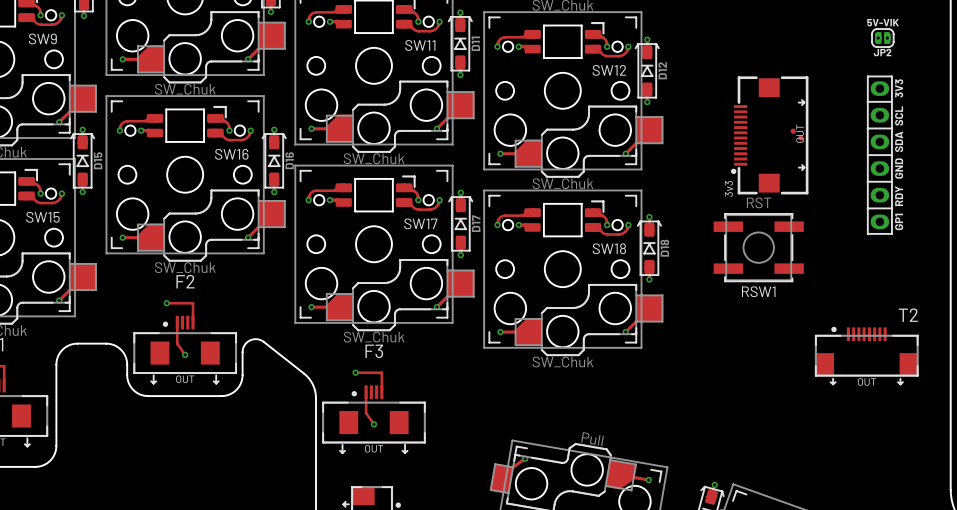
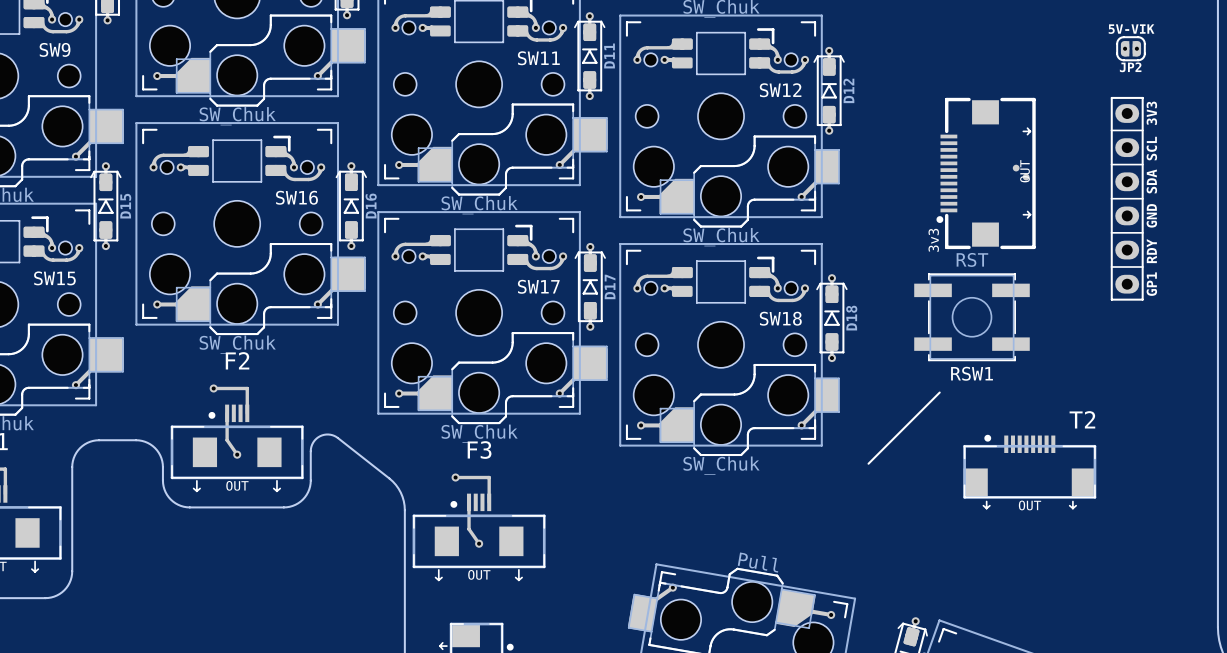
SW12 footprint: [483, 11, 664, 178] -> [619, 14, 840, 228]
SW18 footprint: [483, 189, 664, 356] -> [619, 243, 840, 457]
line: none -> (939, 392) (868, 463)
T2 position: (866, 355) -> (1029, 471)

